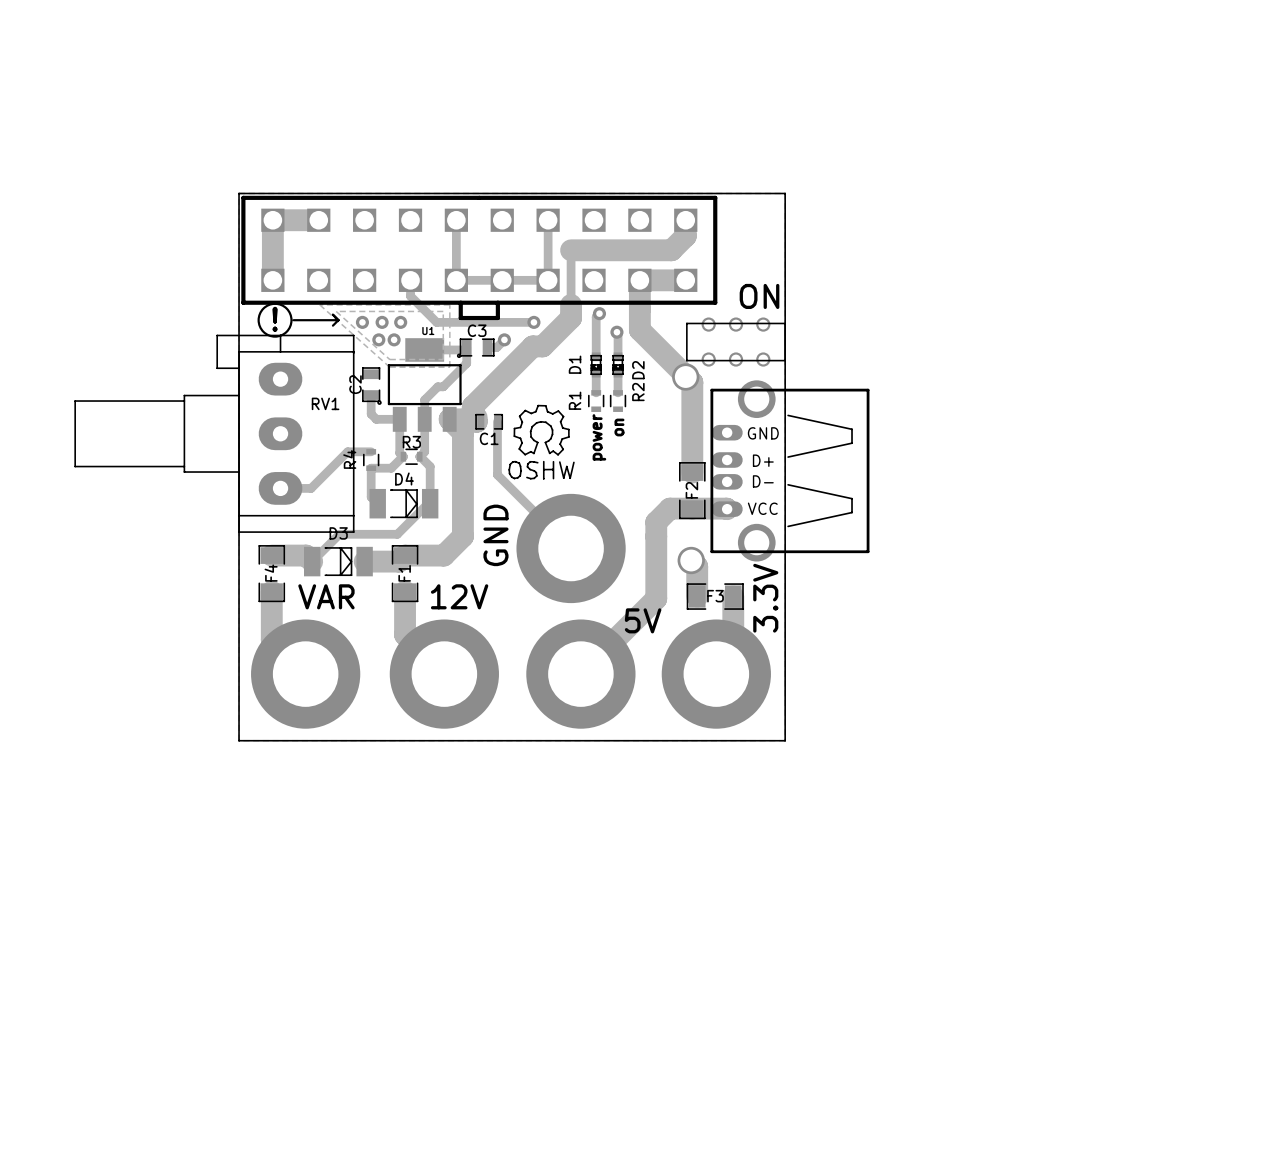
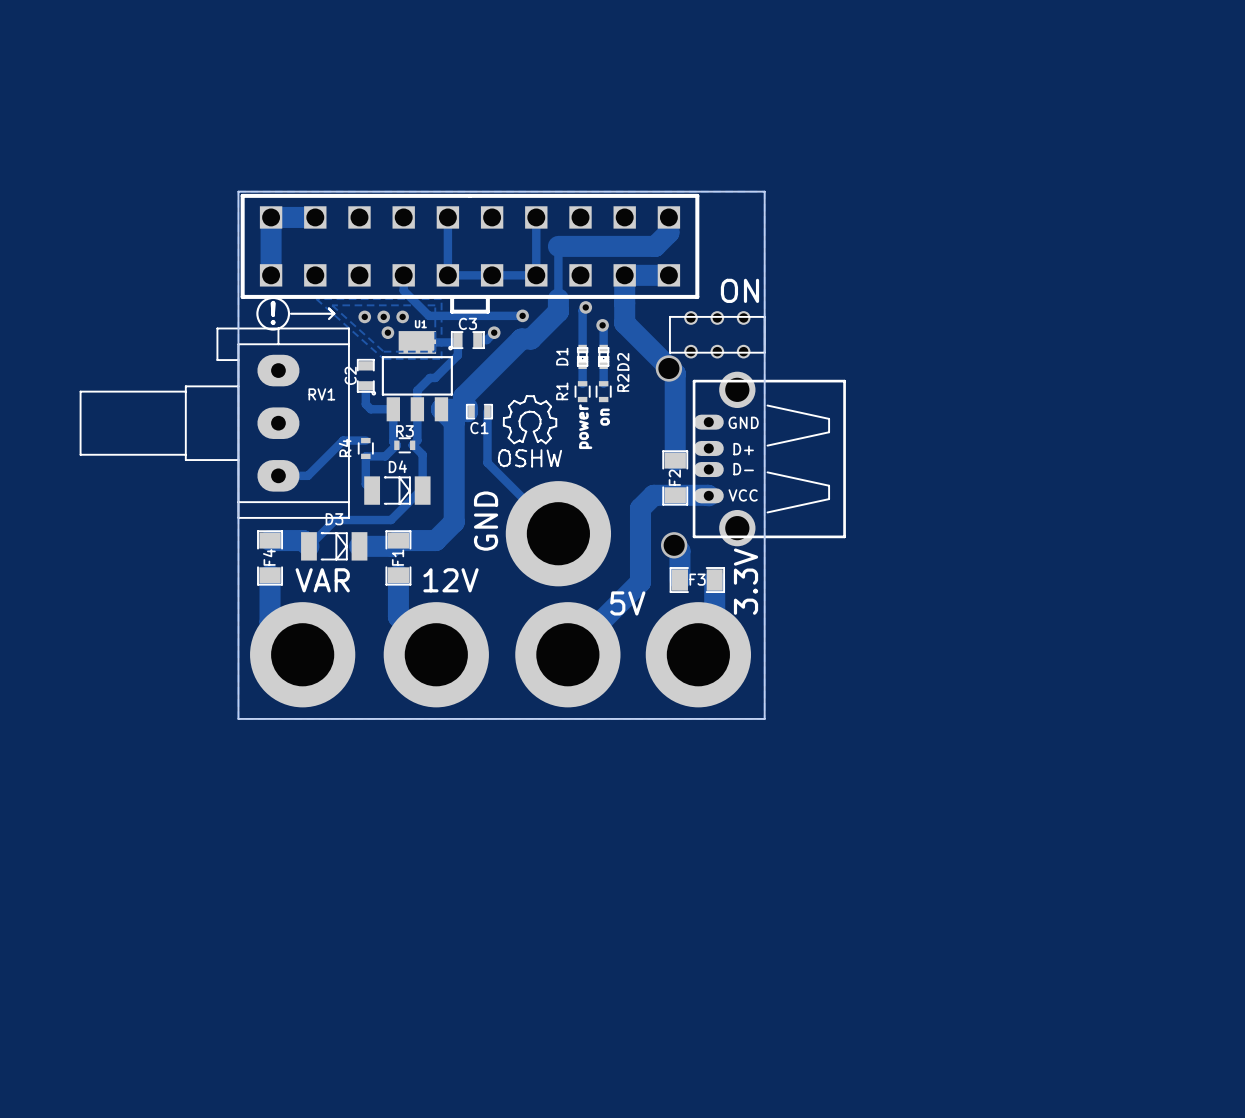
via: (362, 322) -> none
via: (382, 322) -> none
via: (400, 322) -> none
via: none -> (364, 316)
via: none -> (383, 316)
via: none -> (402, 316)
via: (378, 339) -> none

